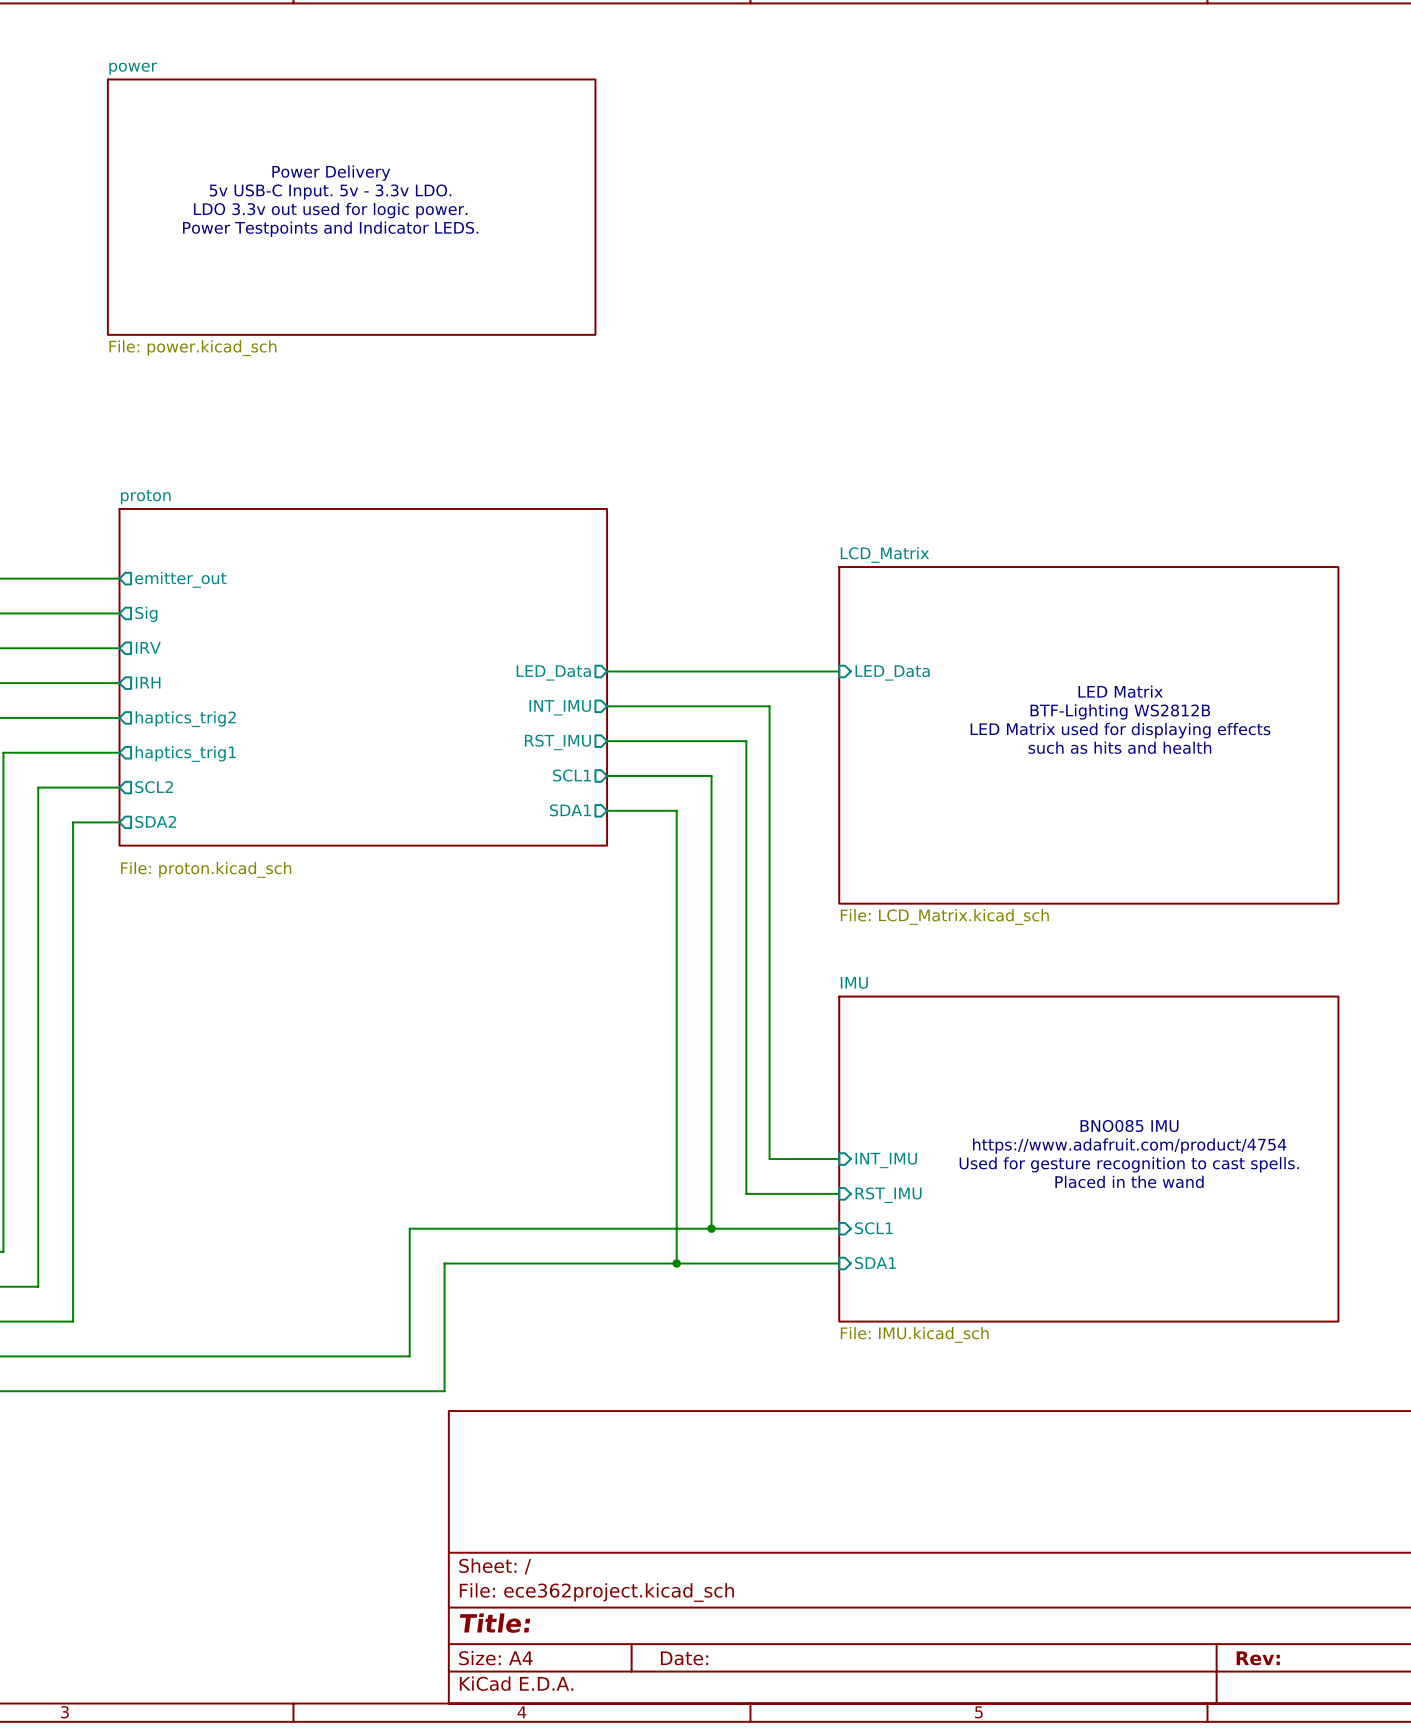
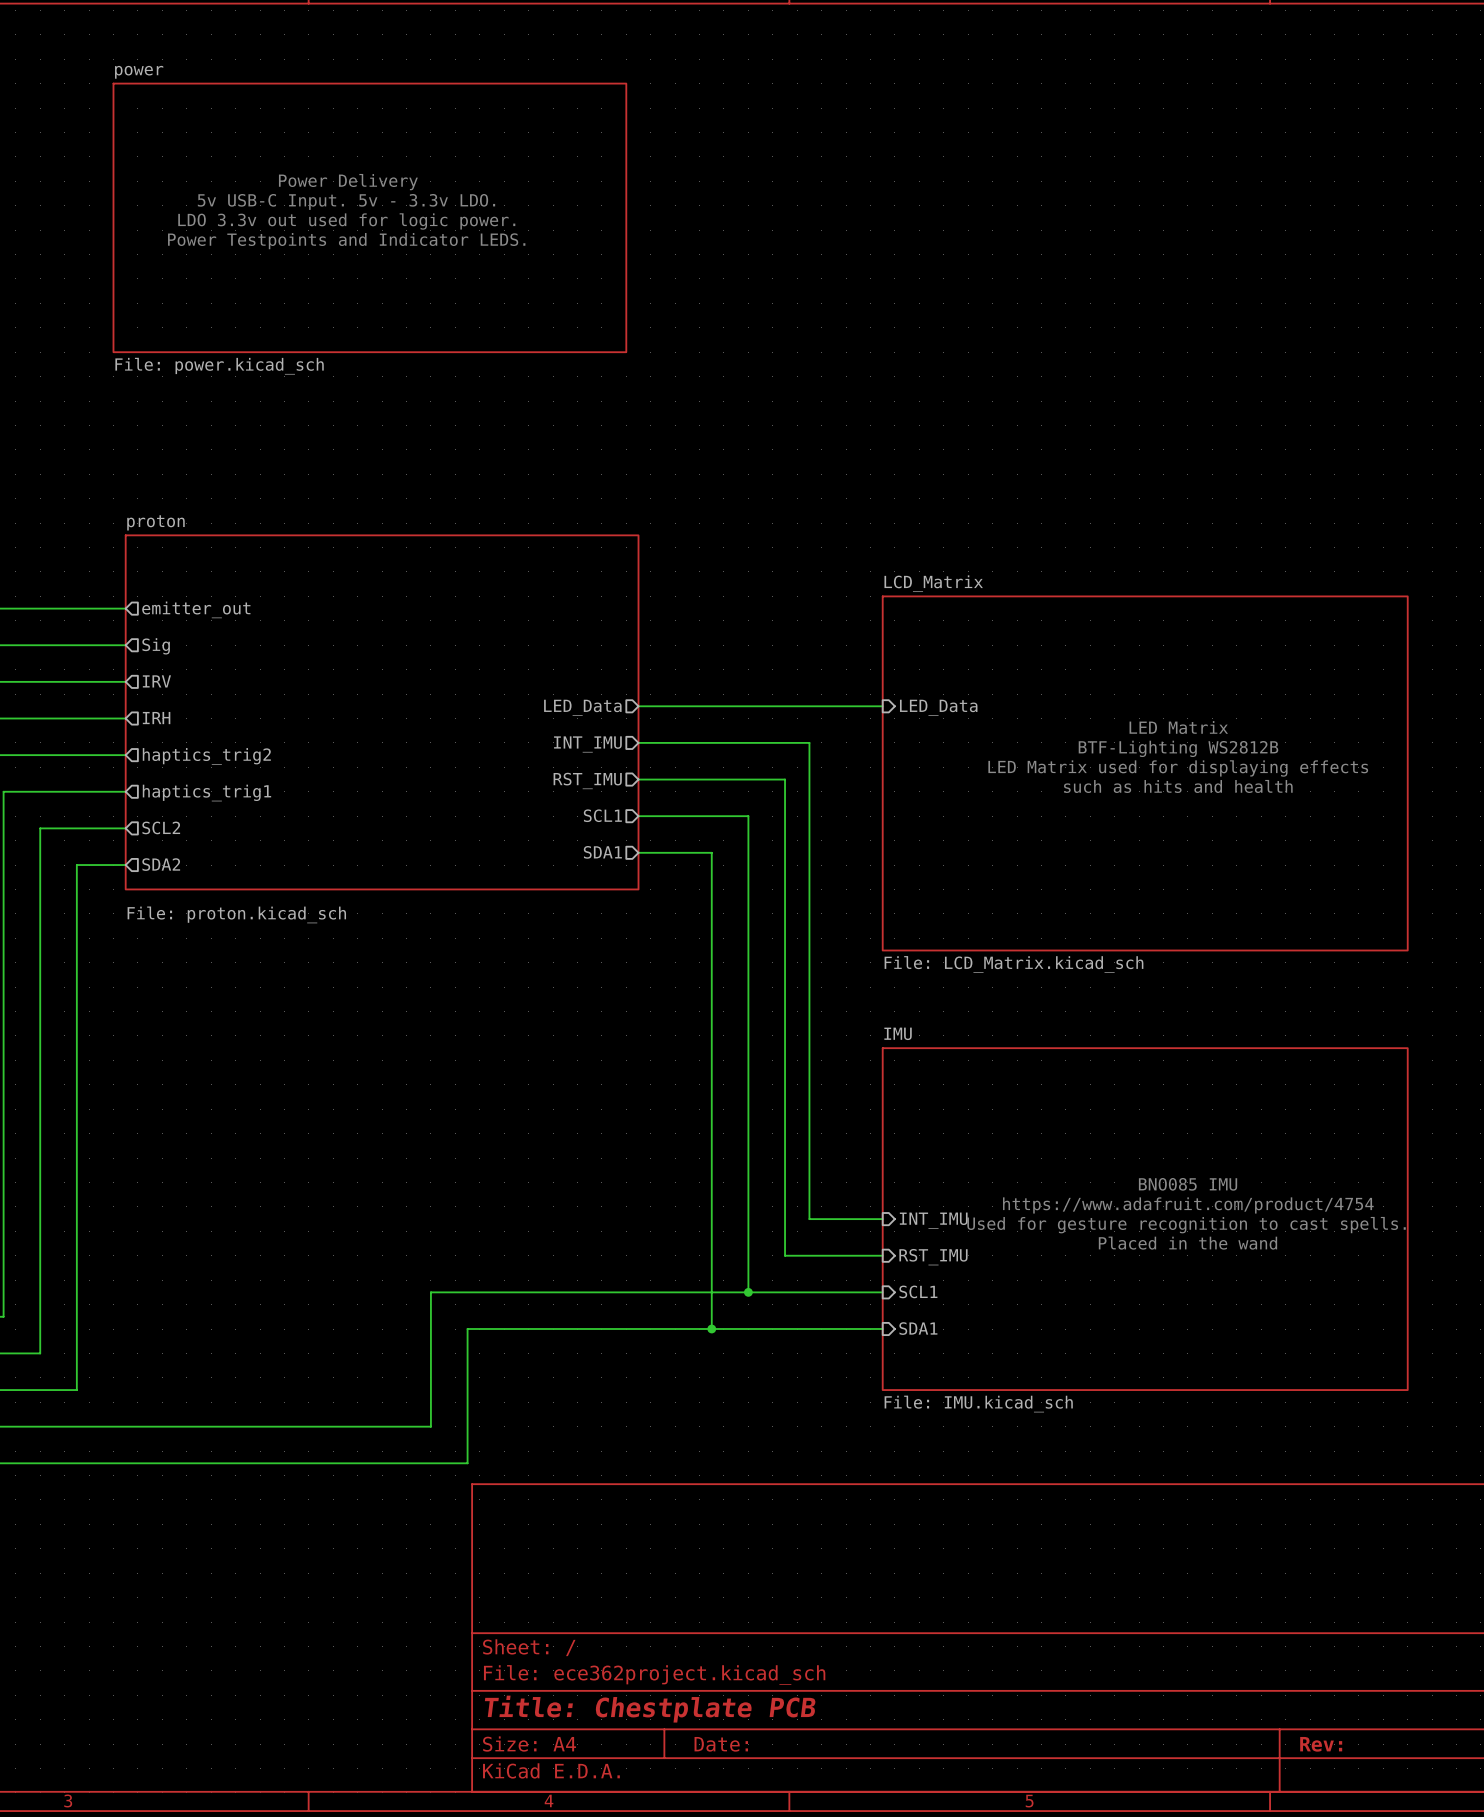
title block: Title: (495, 1623) -> Title: Chestplate PCB (650, 1709)

